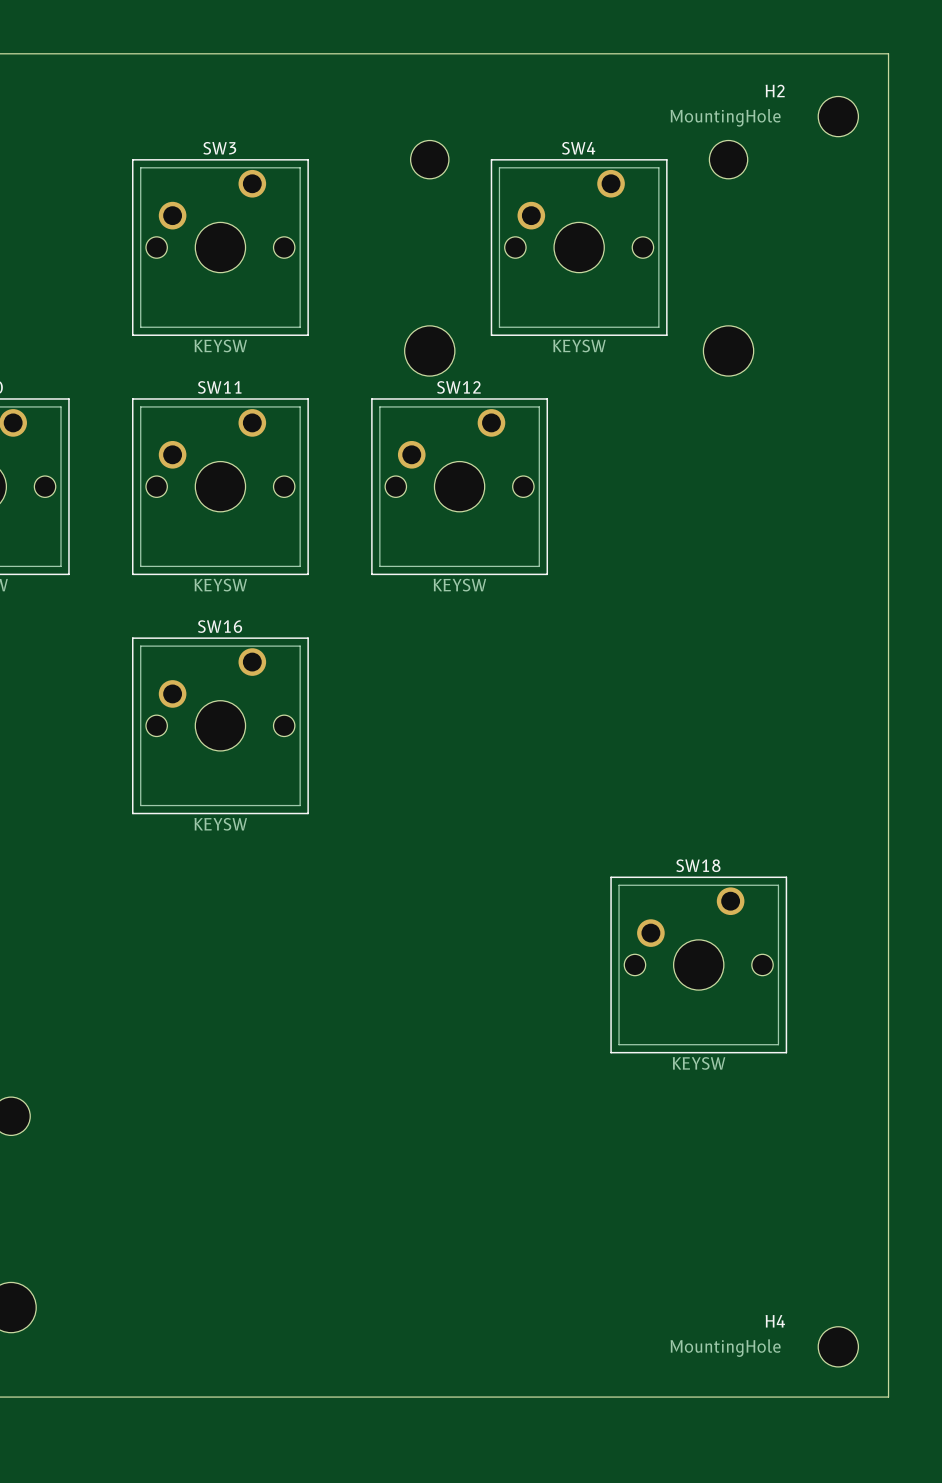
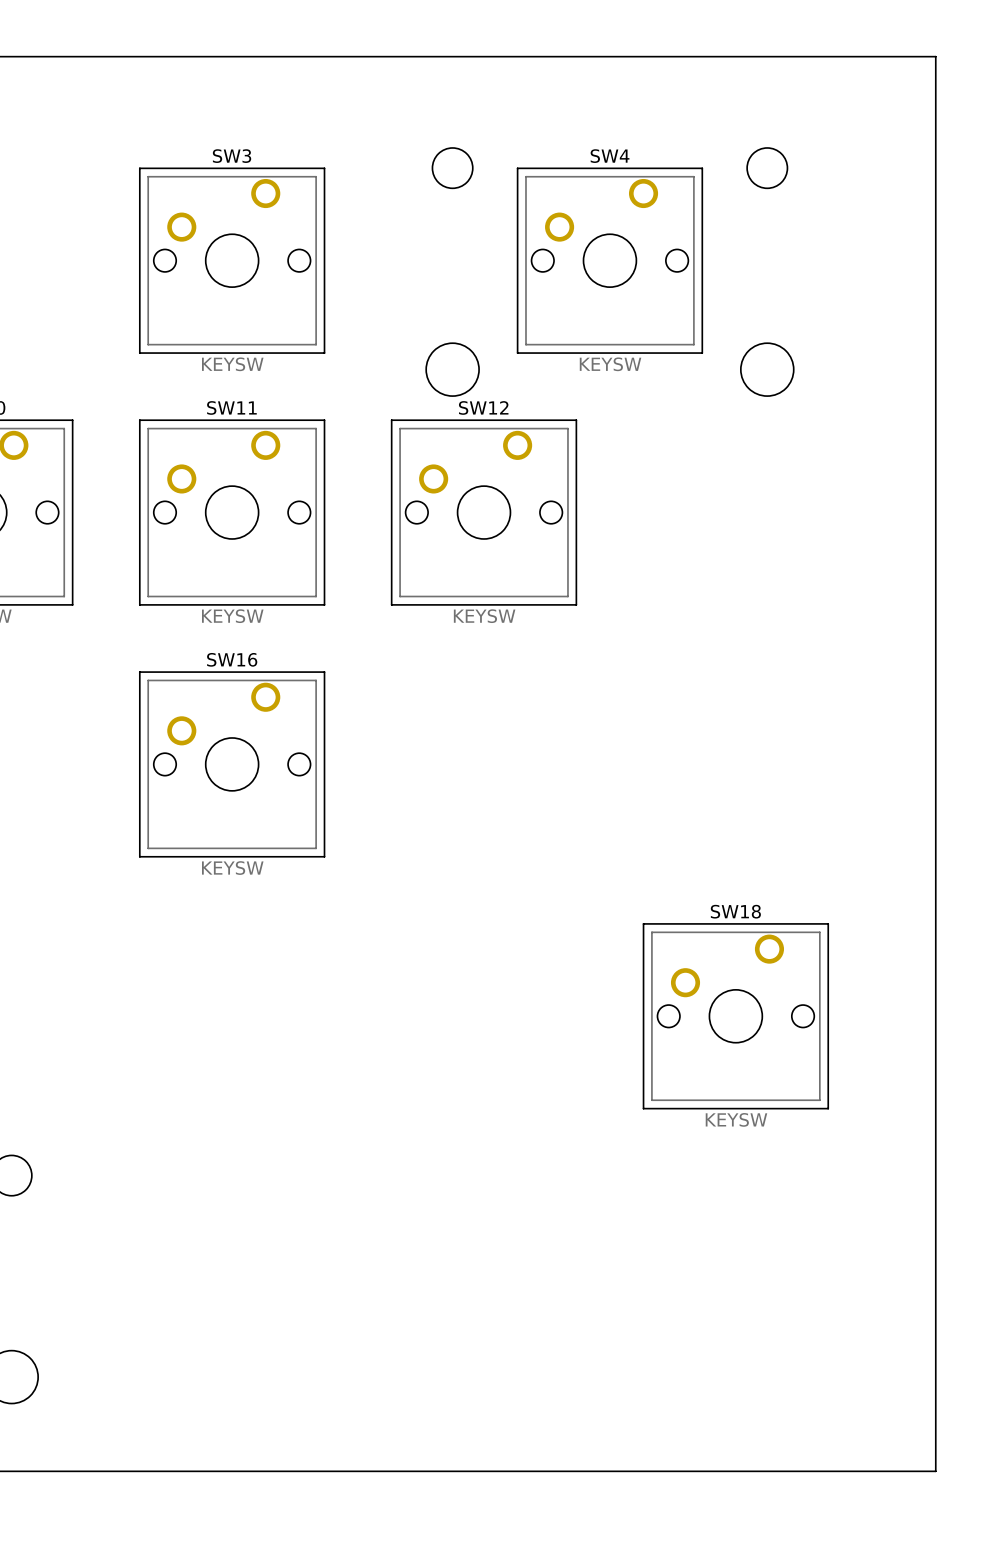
H2: MountingHole (838, 116) -> none
H4: MountingHole (838, 1346) -> none

